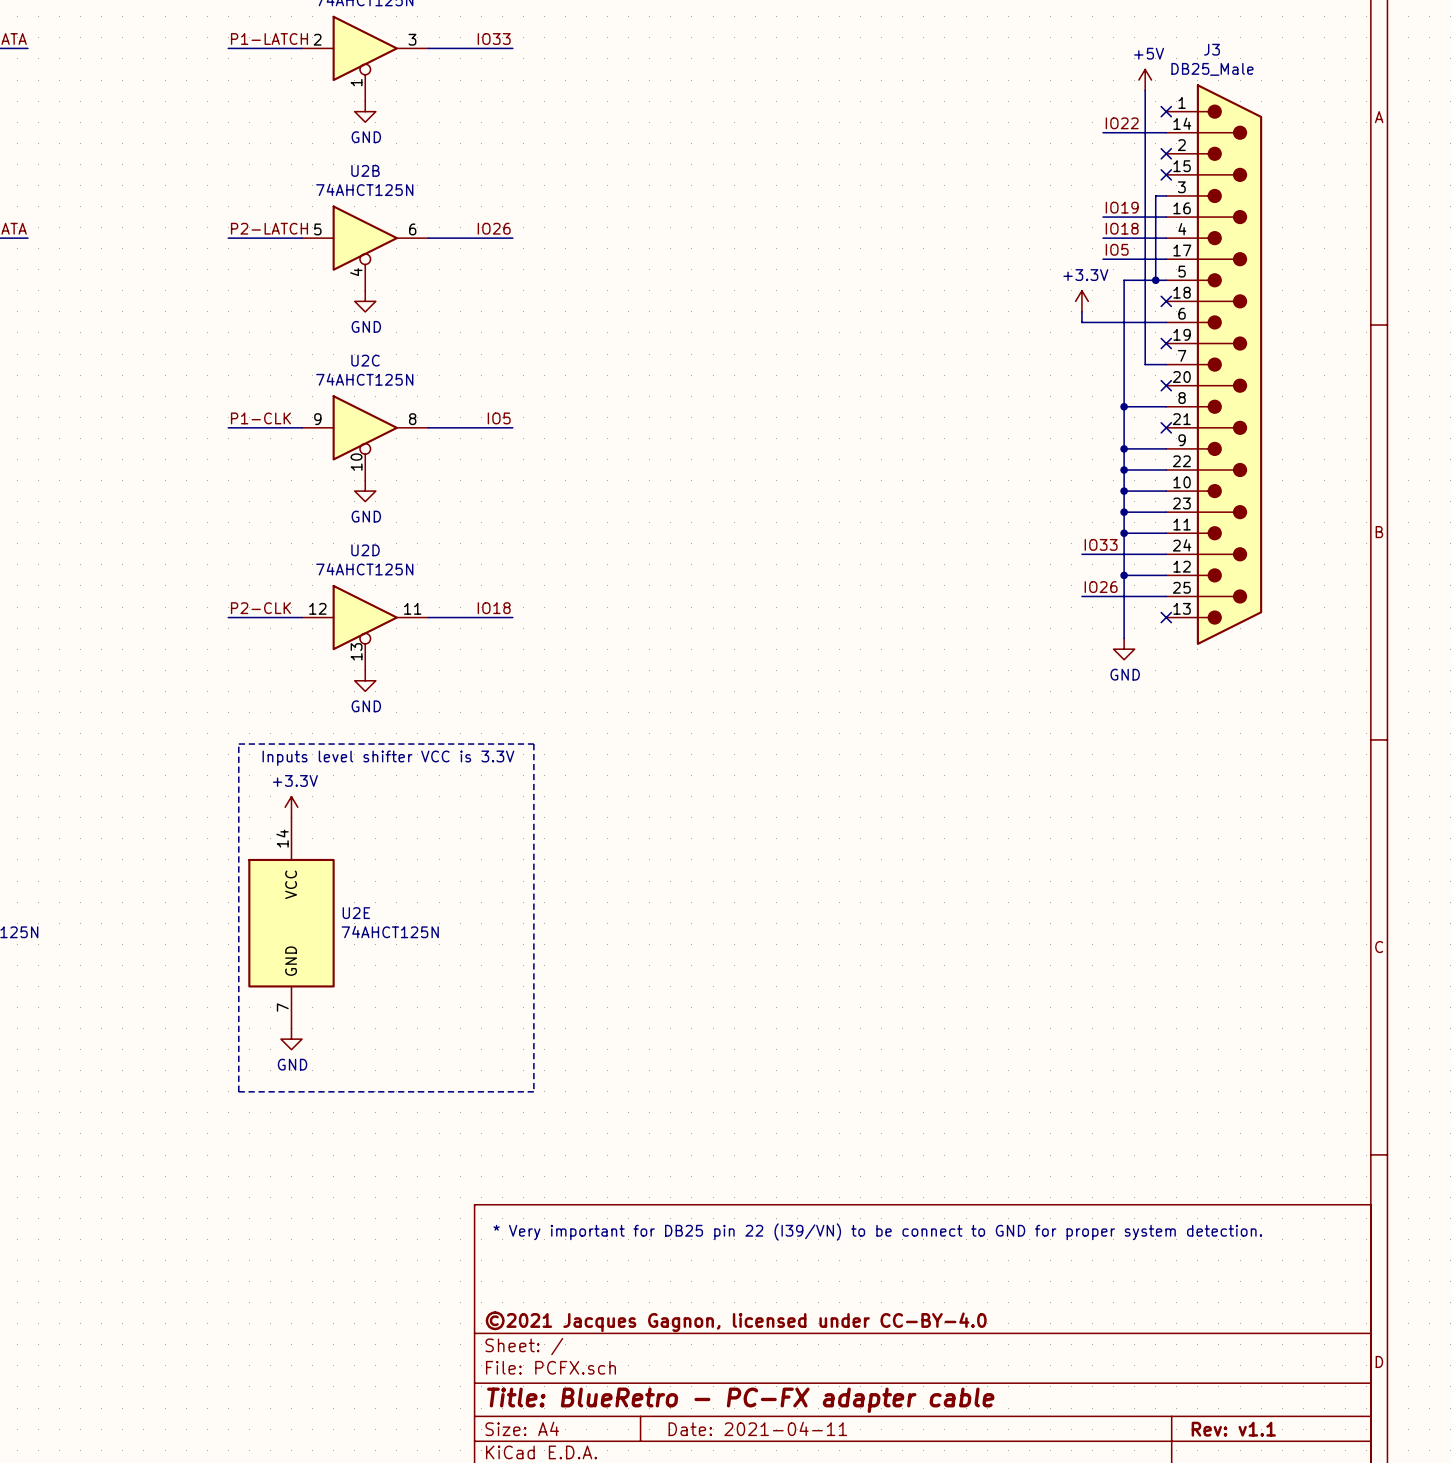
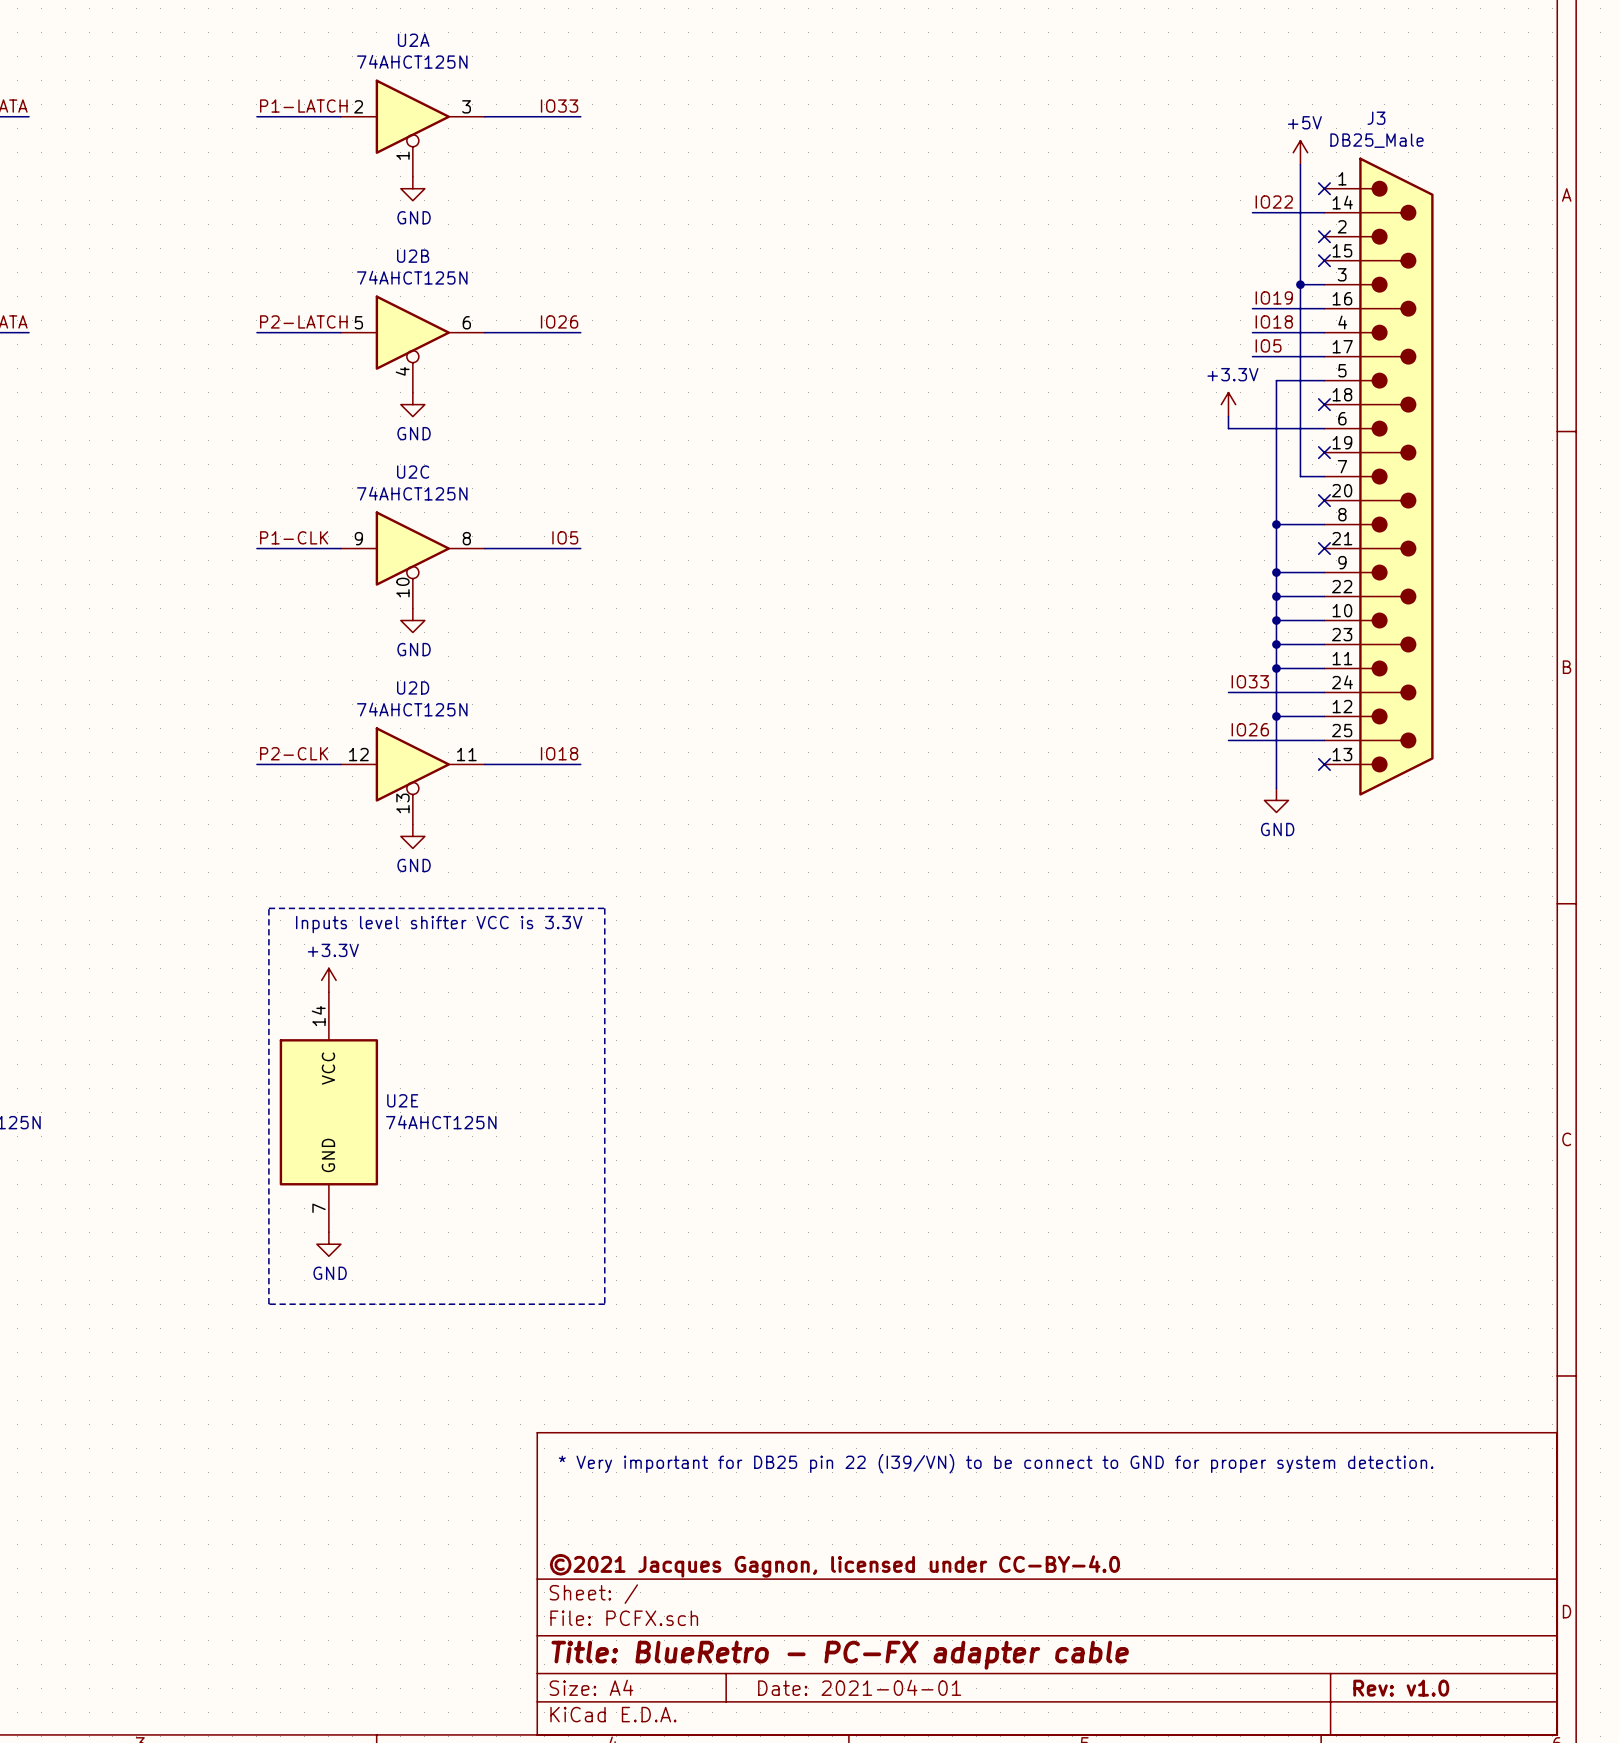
junction: none -> (1300, 284)
wire: (1155, 195) (1155, 280) -> (1312, 284) (1300, 284)
junction: (1155, 280) -> none
title block: Date: 2021-04-11 (757, 1428) -> Date: 2021-04-01 (859, 1687)
title block: Rev: v1.1 (1233, 1429) -> Rev: v1.0 (1401, 1688)

